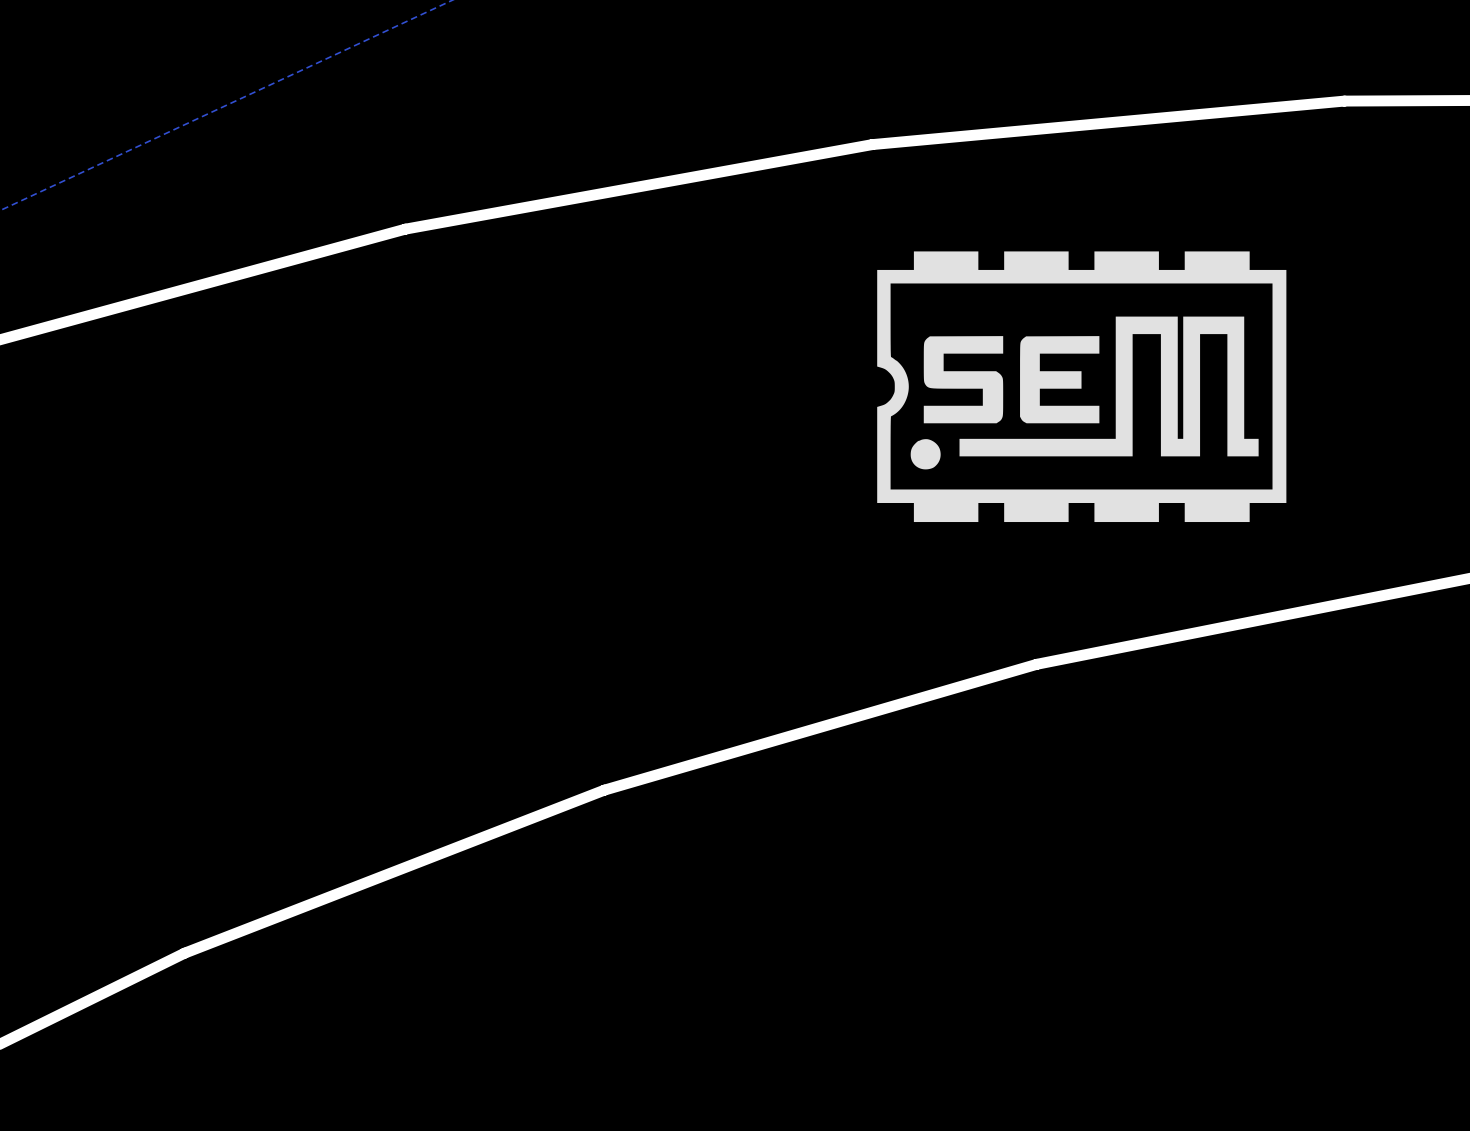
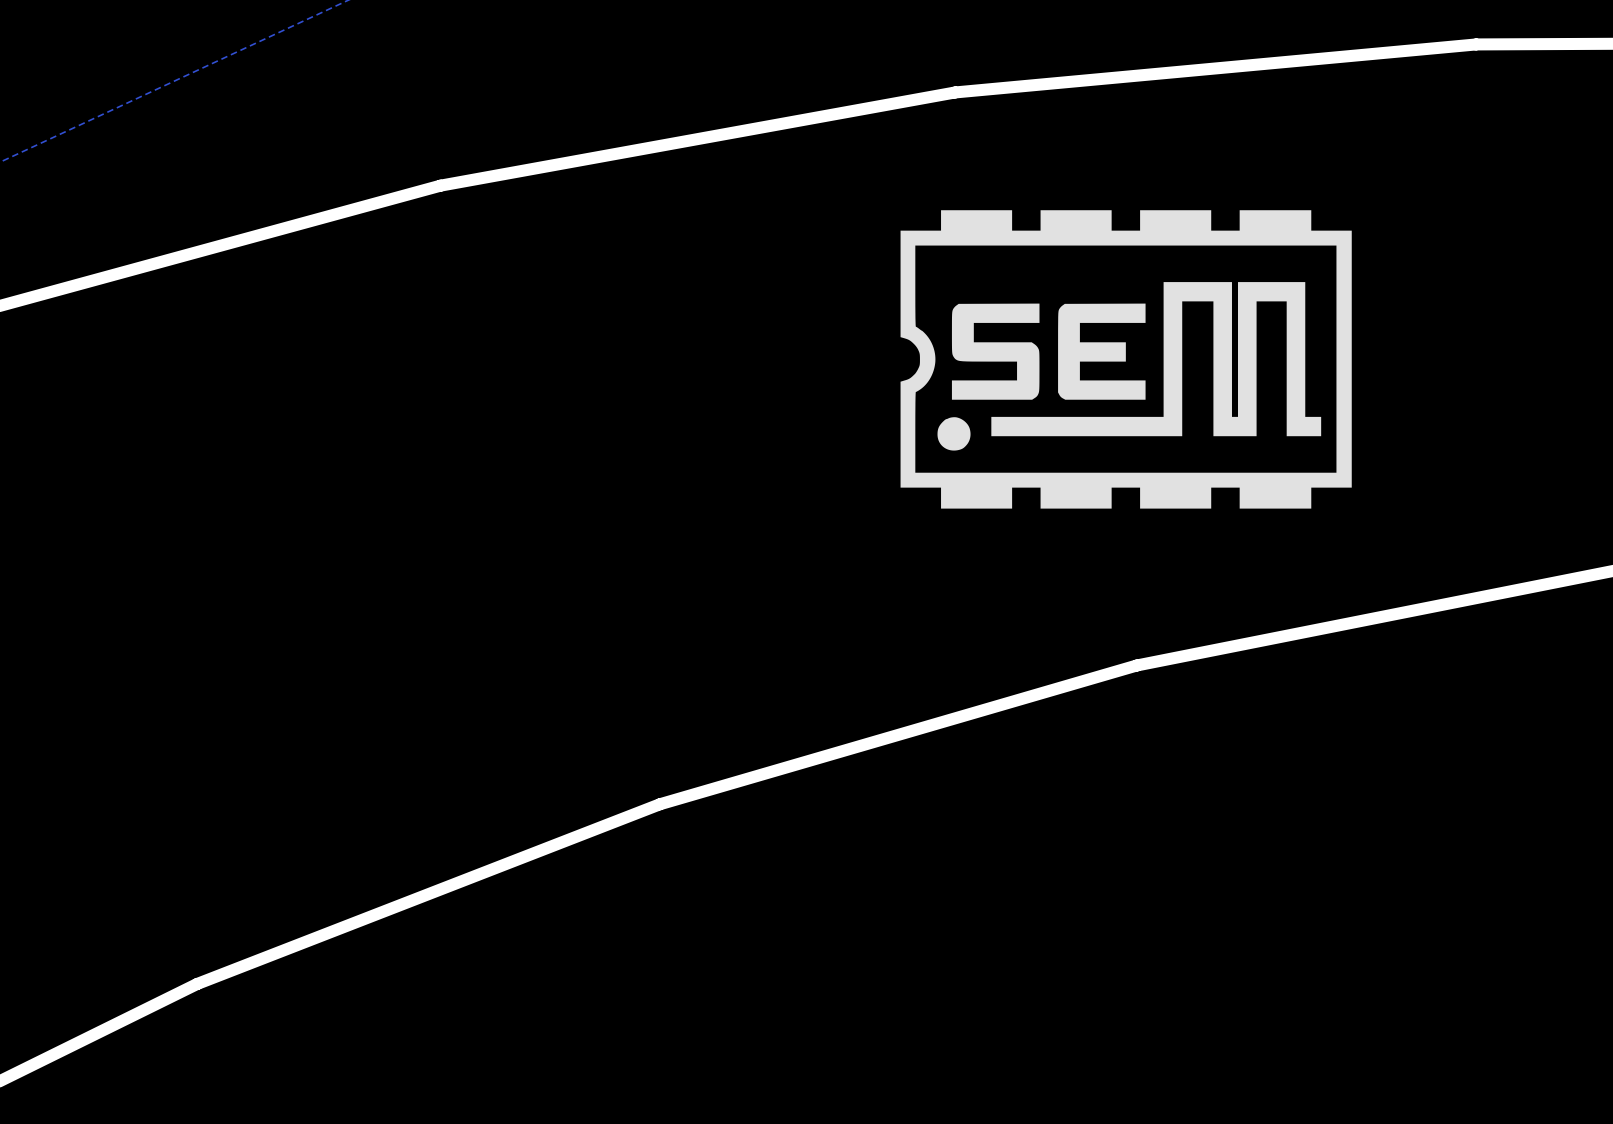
drawing position: (963, 379) -> (995, 351)
drawing position: (1059, 379) -> (1101, 351)
drawing position: (1081, 386) -> (1126, 359)
drawing position: (1109, 386) -> (1156, 359)
drawing position: (925, 454) -> (954, 433)

